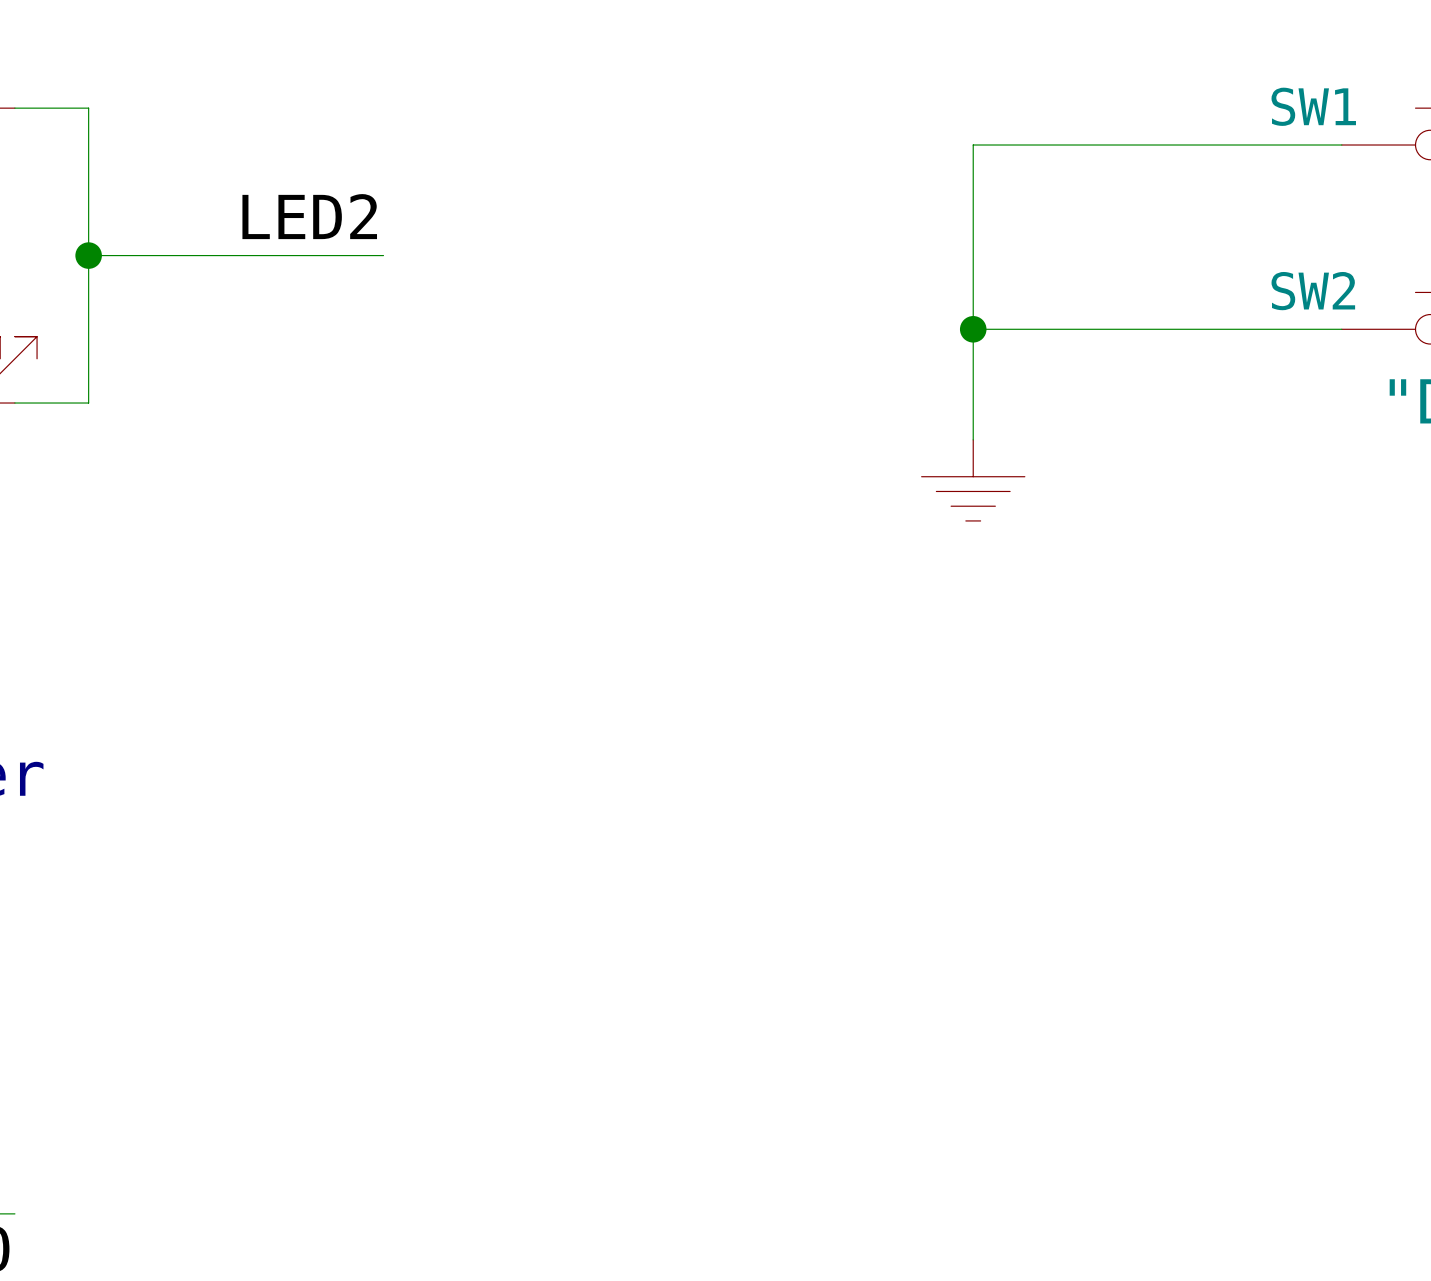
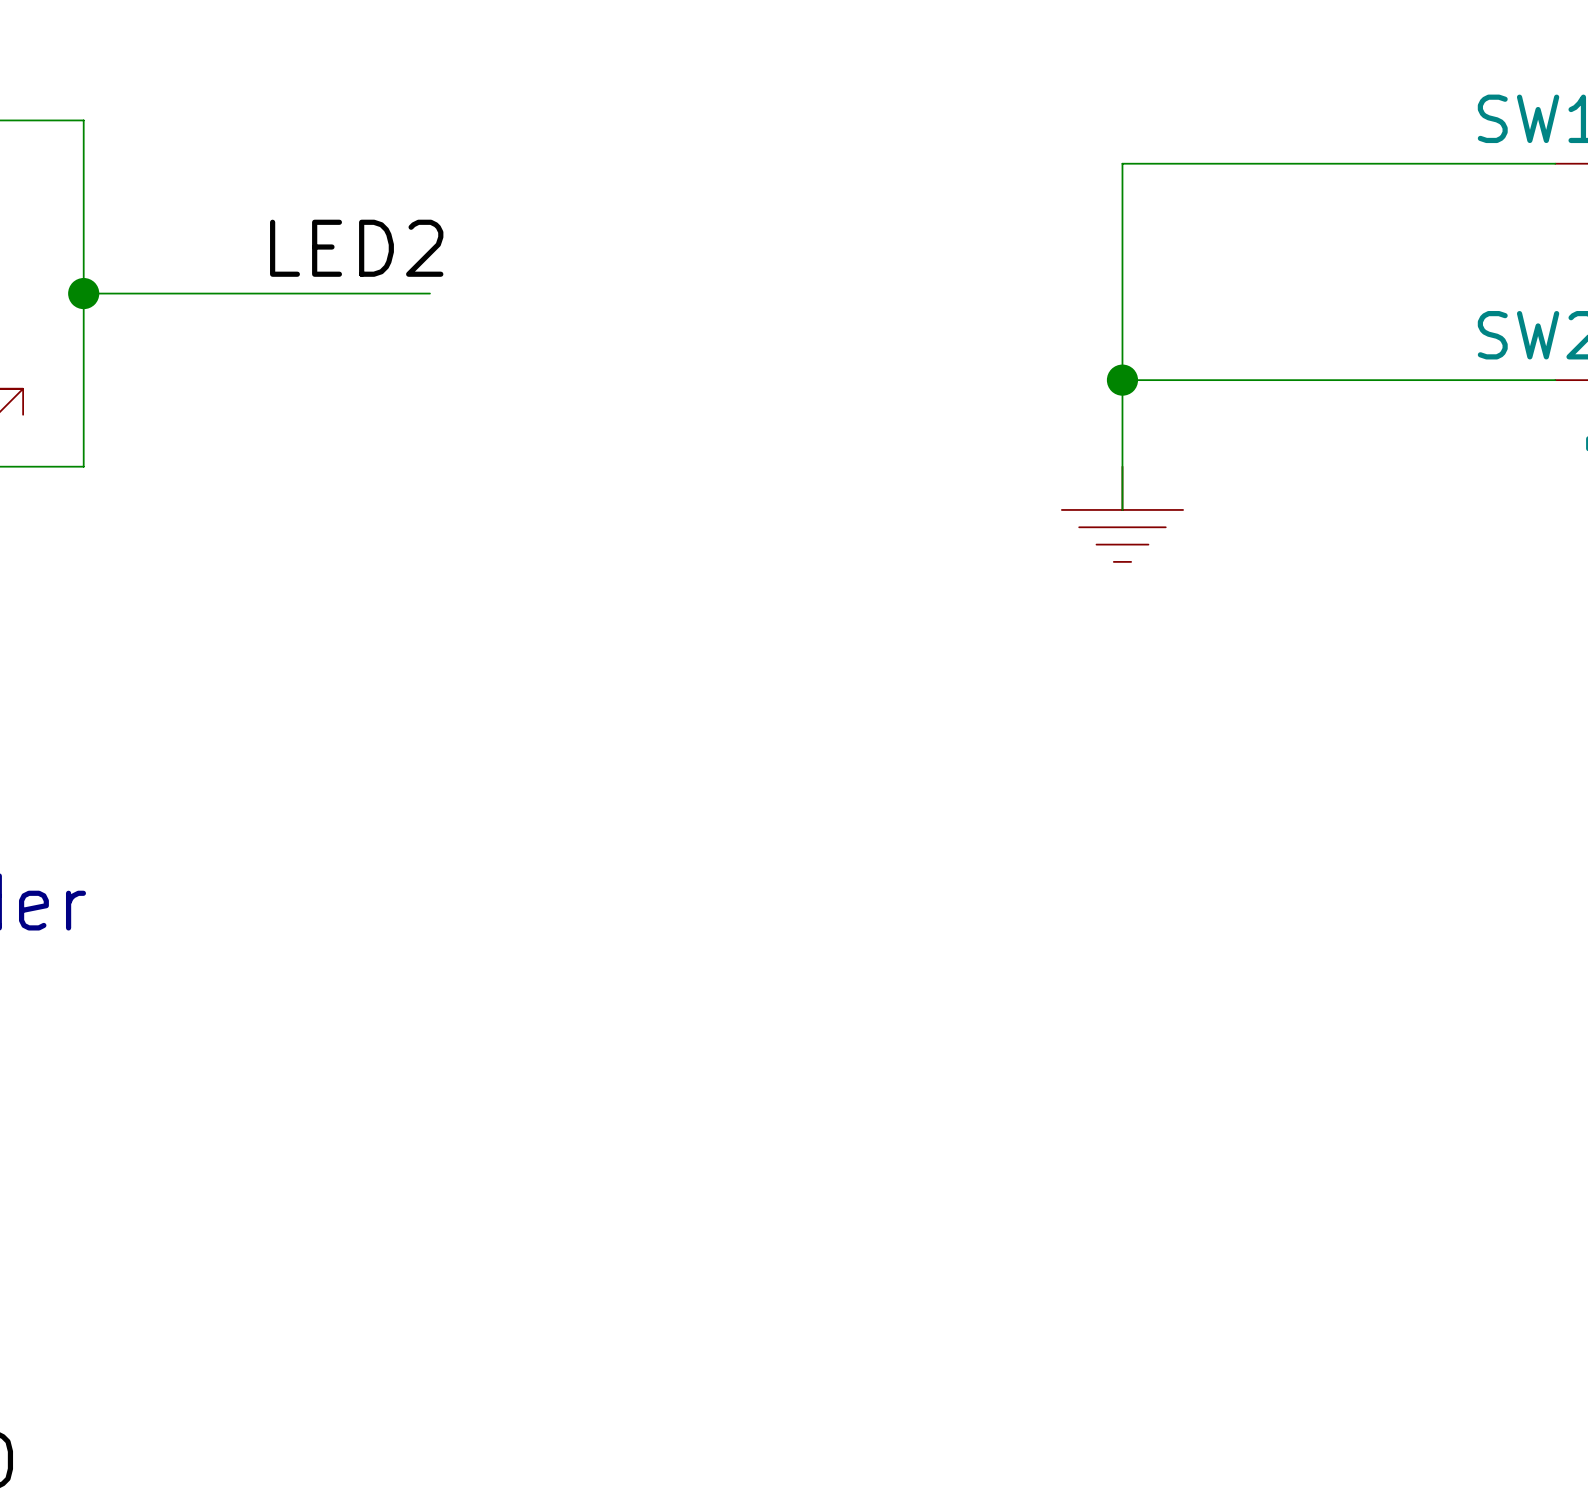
power symbol position: (973, 480) -> (1122, 514)

